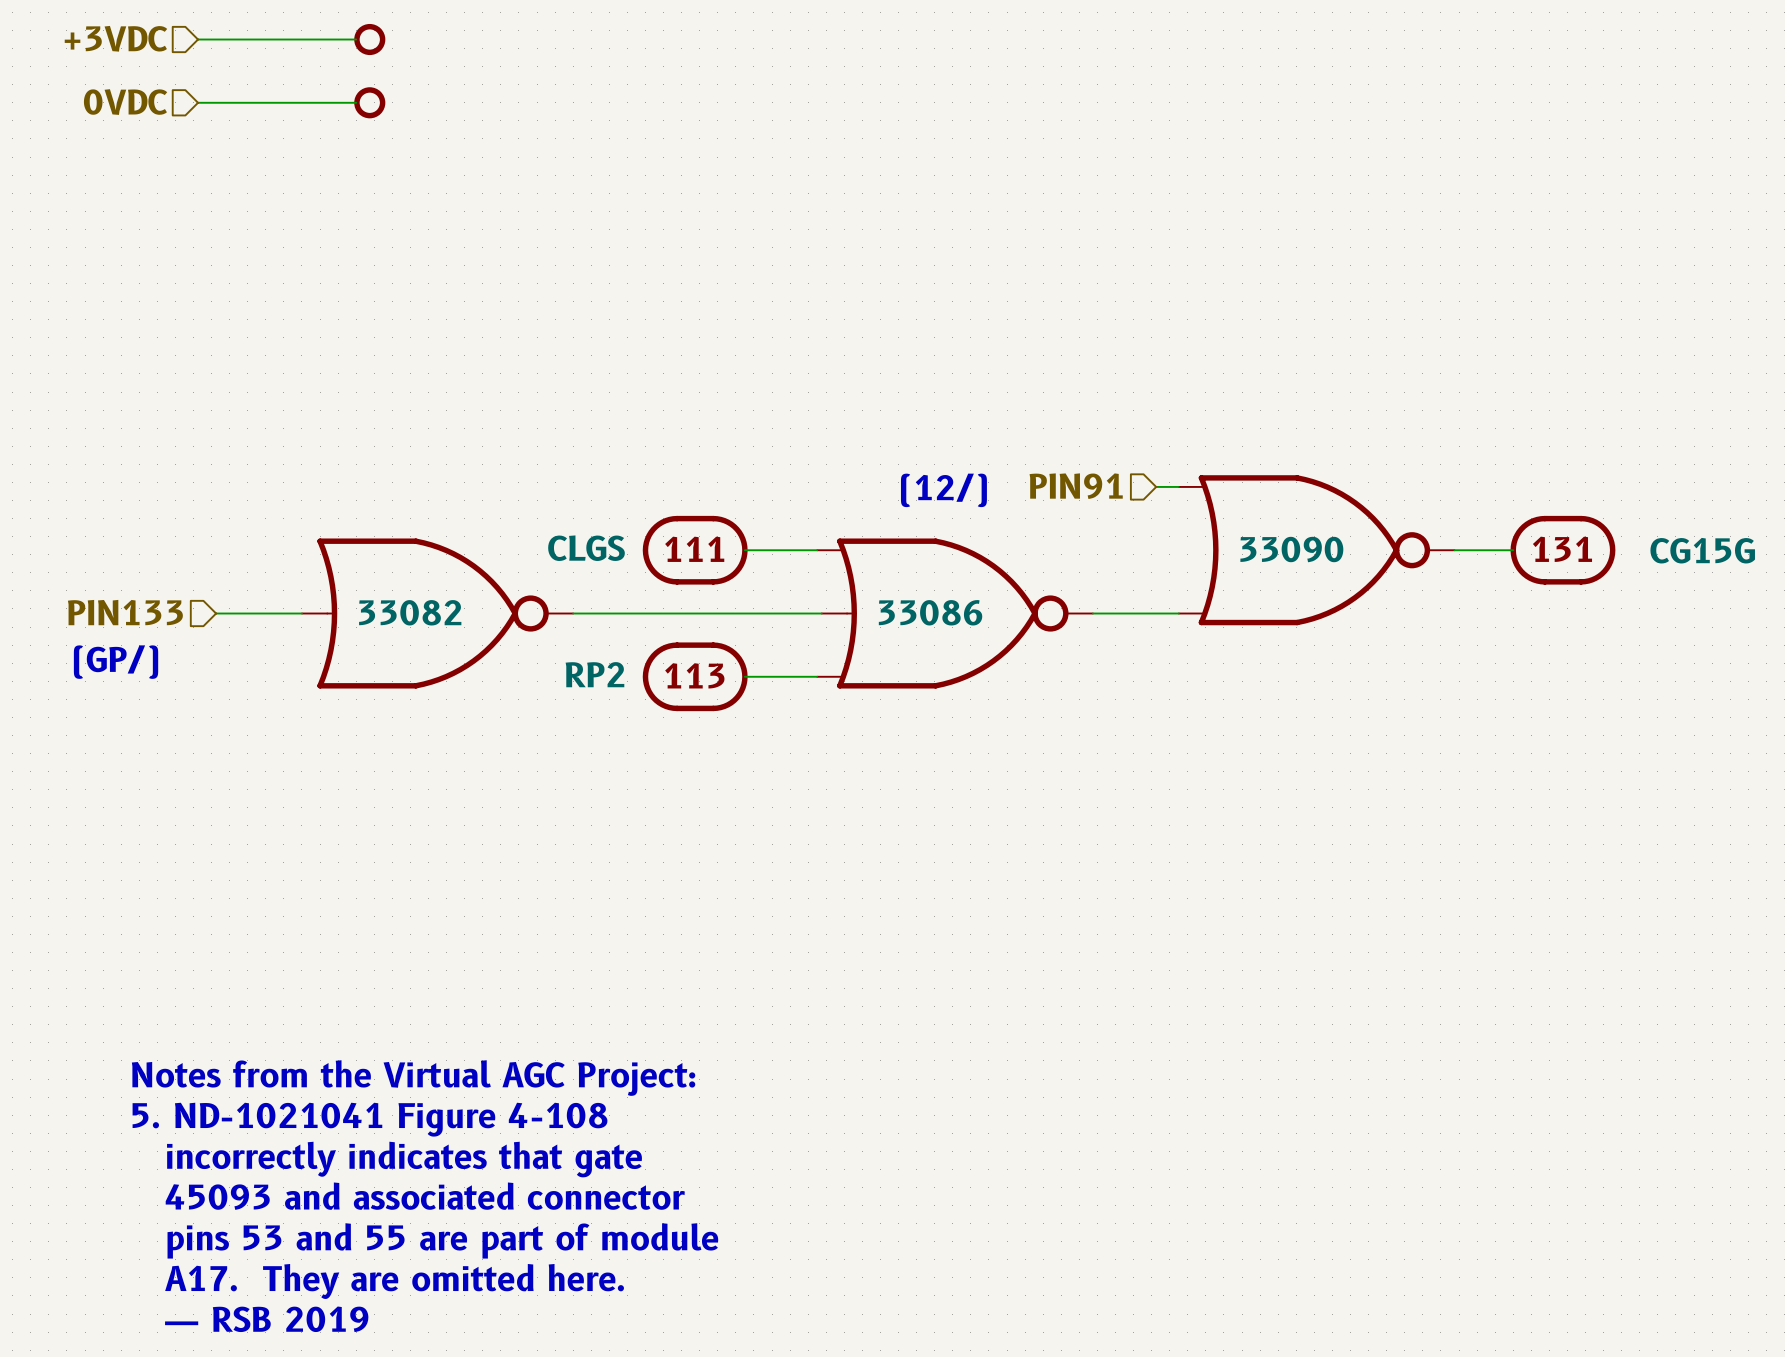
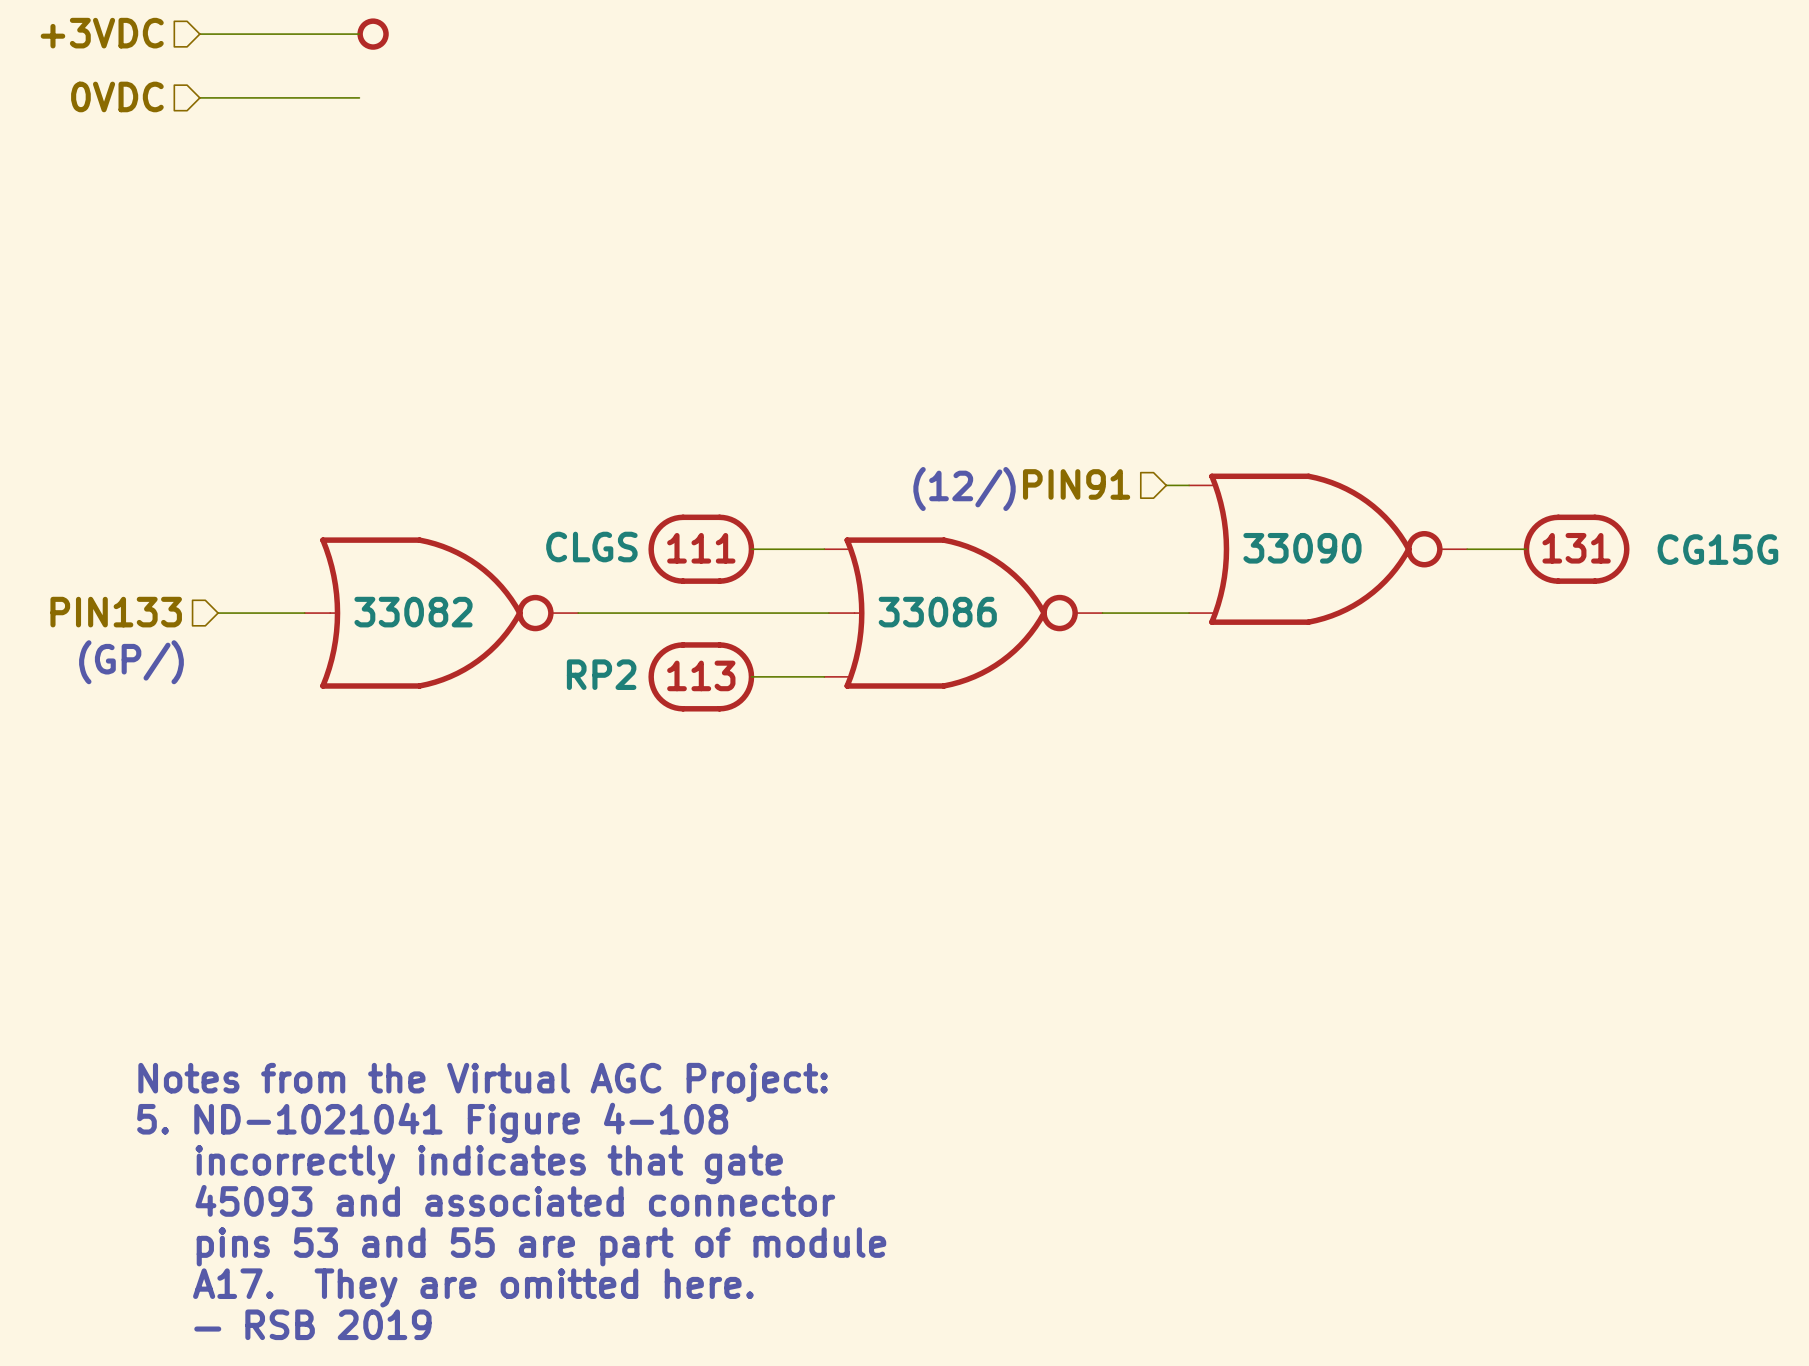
part: (369, 102) -> none

